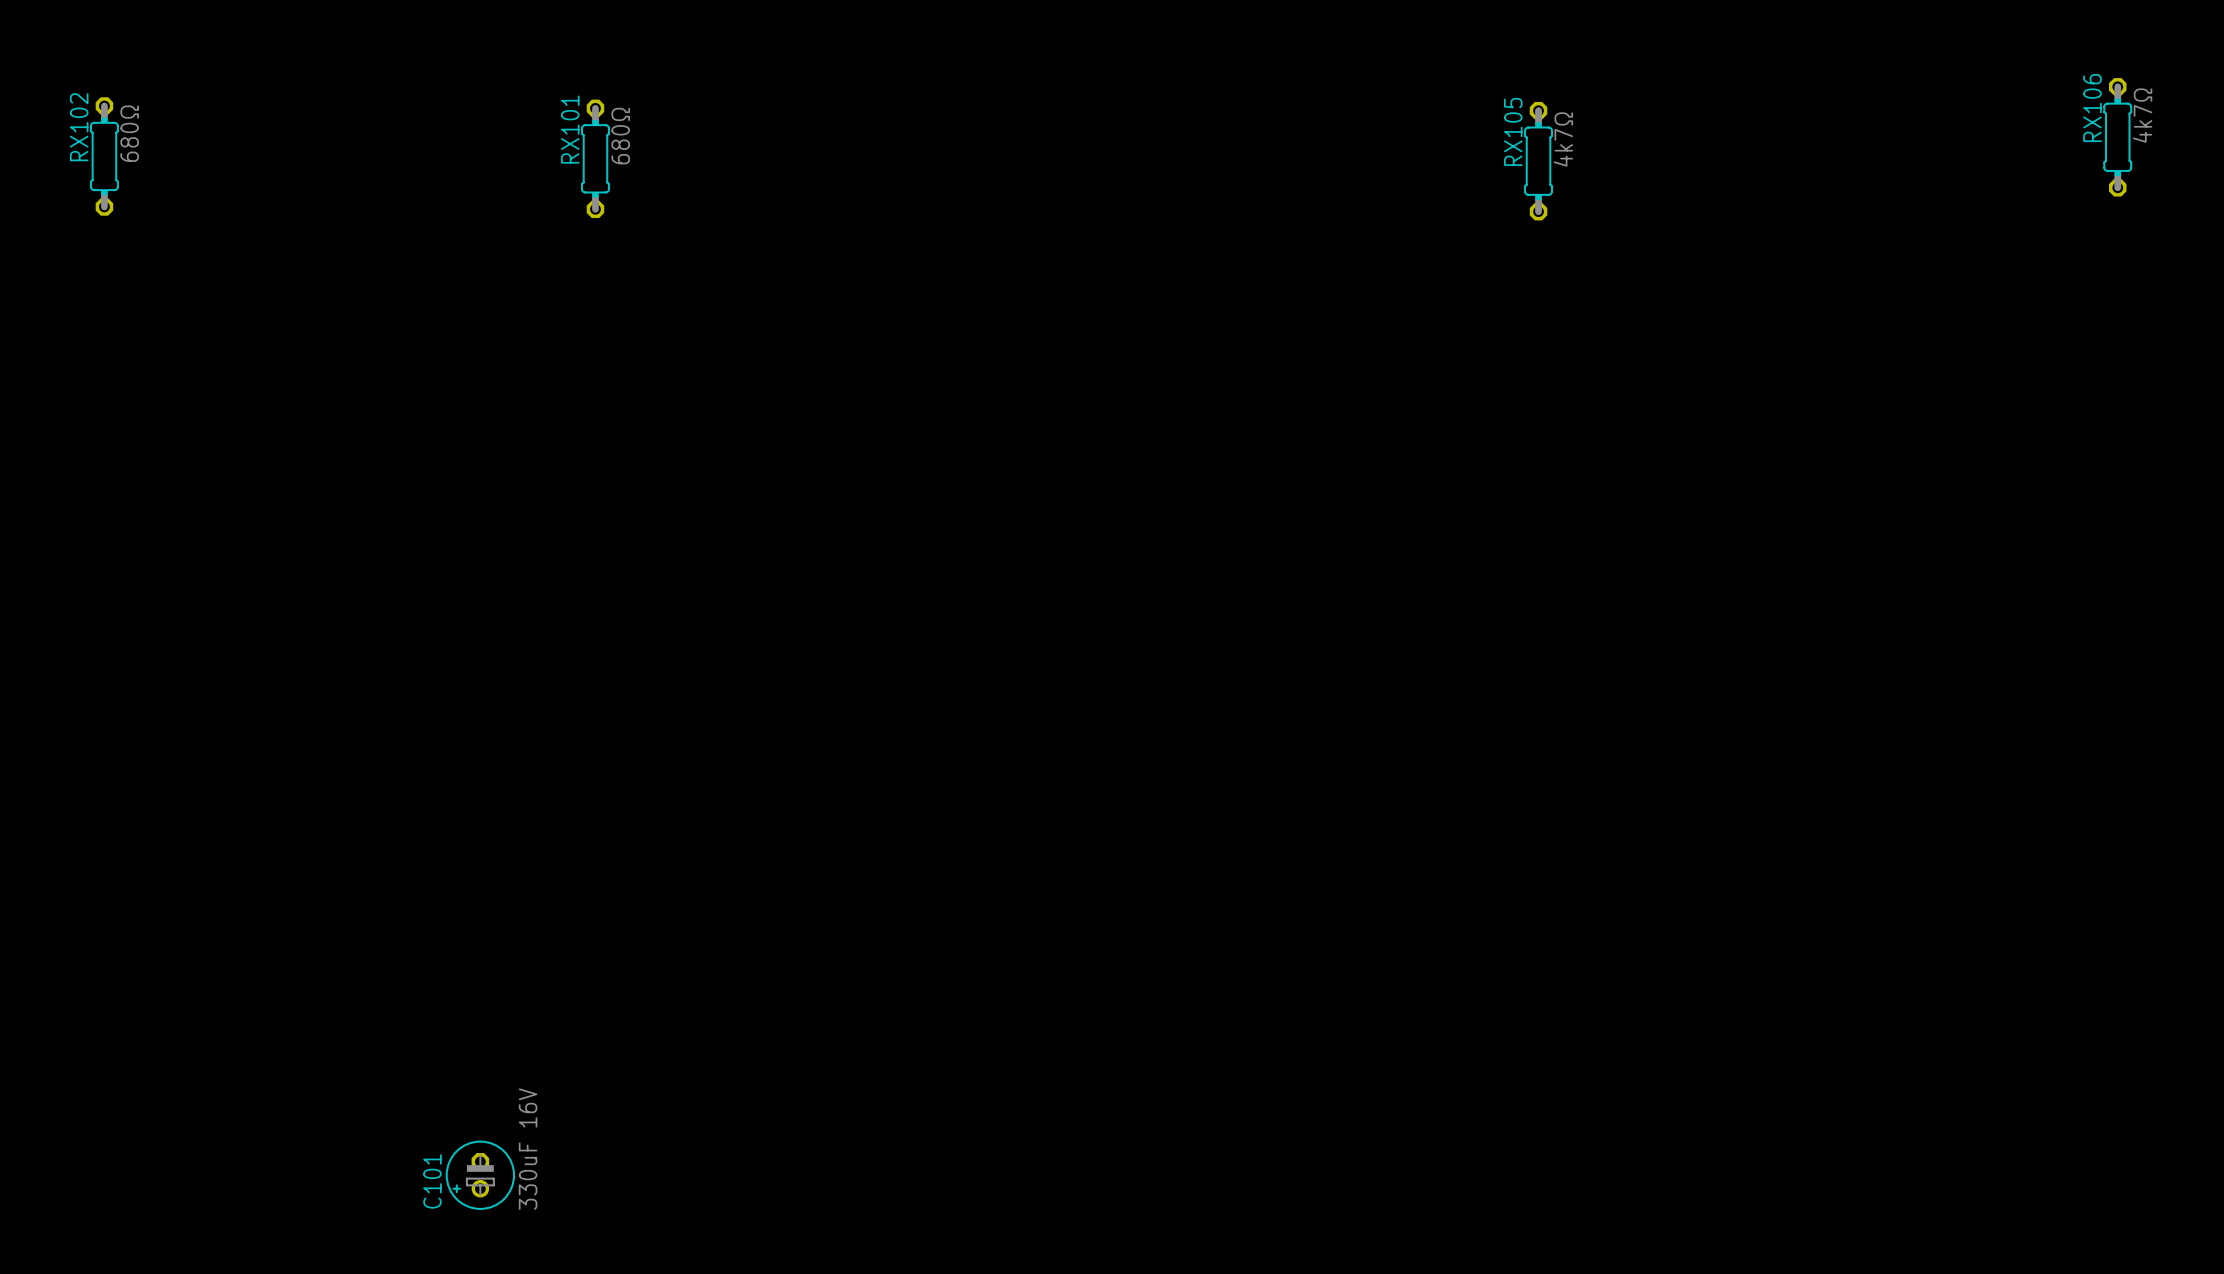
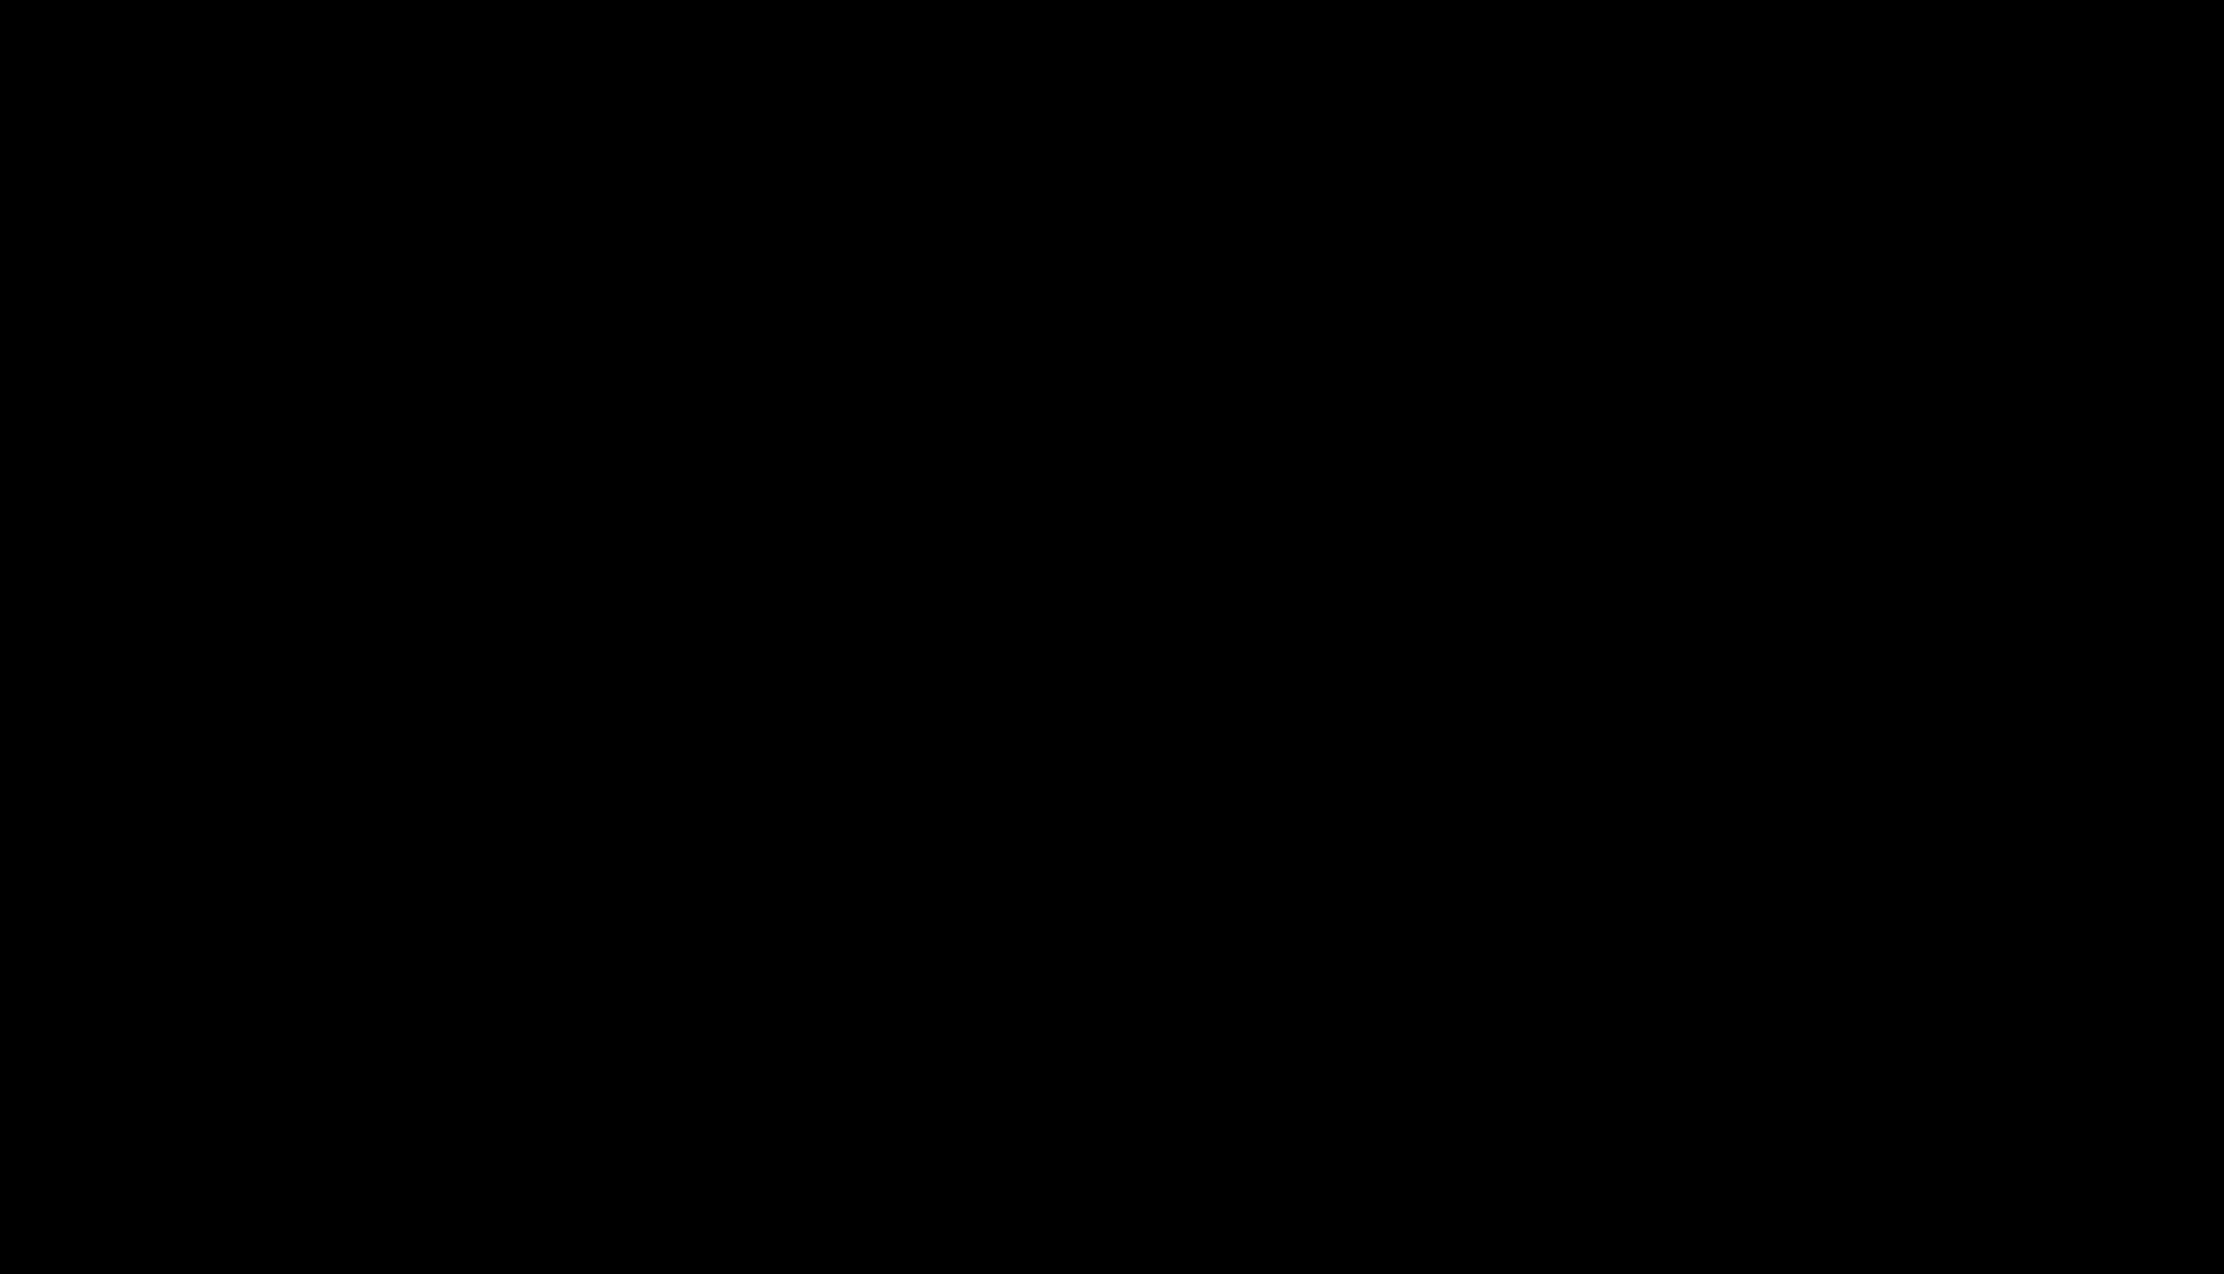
RX106: 4k7Ω (2117, 137) -> none
RX102: 680Ω (104, 156) -> none
RX101: 680Ω (595, 158) -> none
RX105: 4k7Ω (1538, 161) -> none
C101: 330uF 16V (480, 1175) -> none

